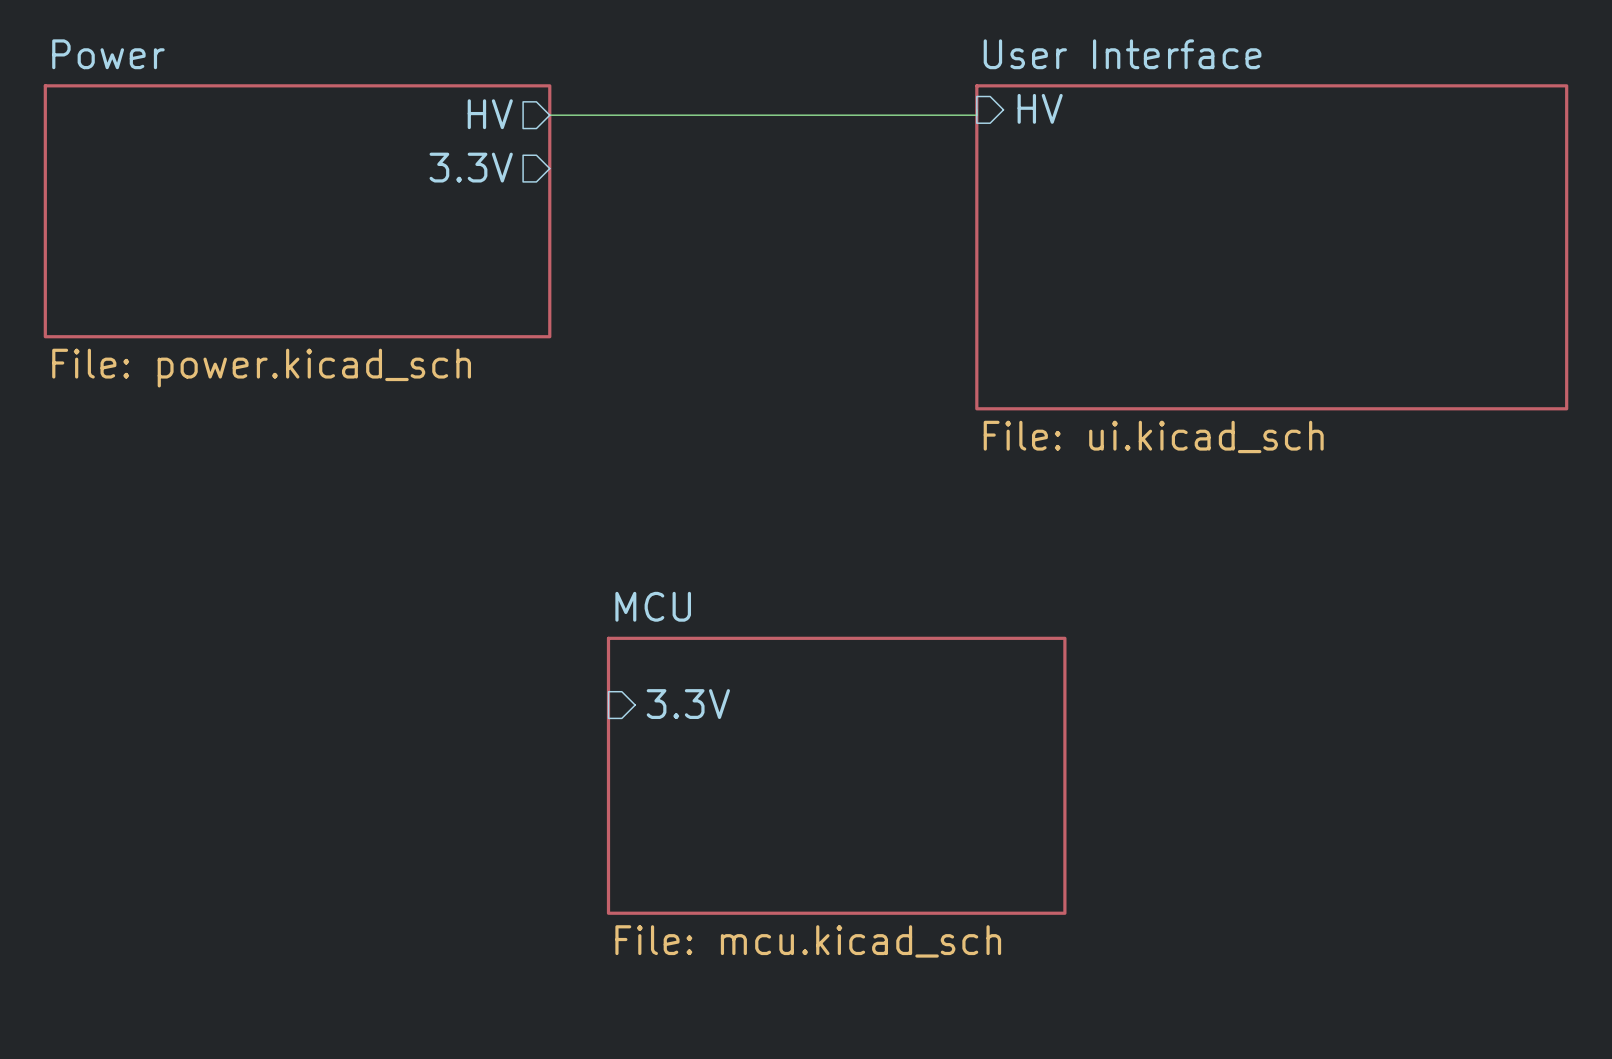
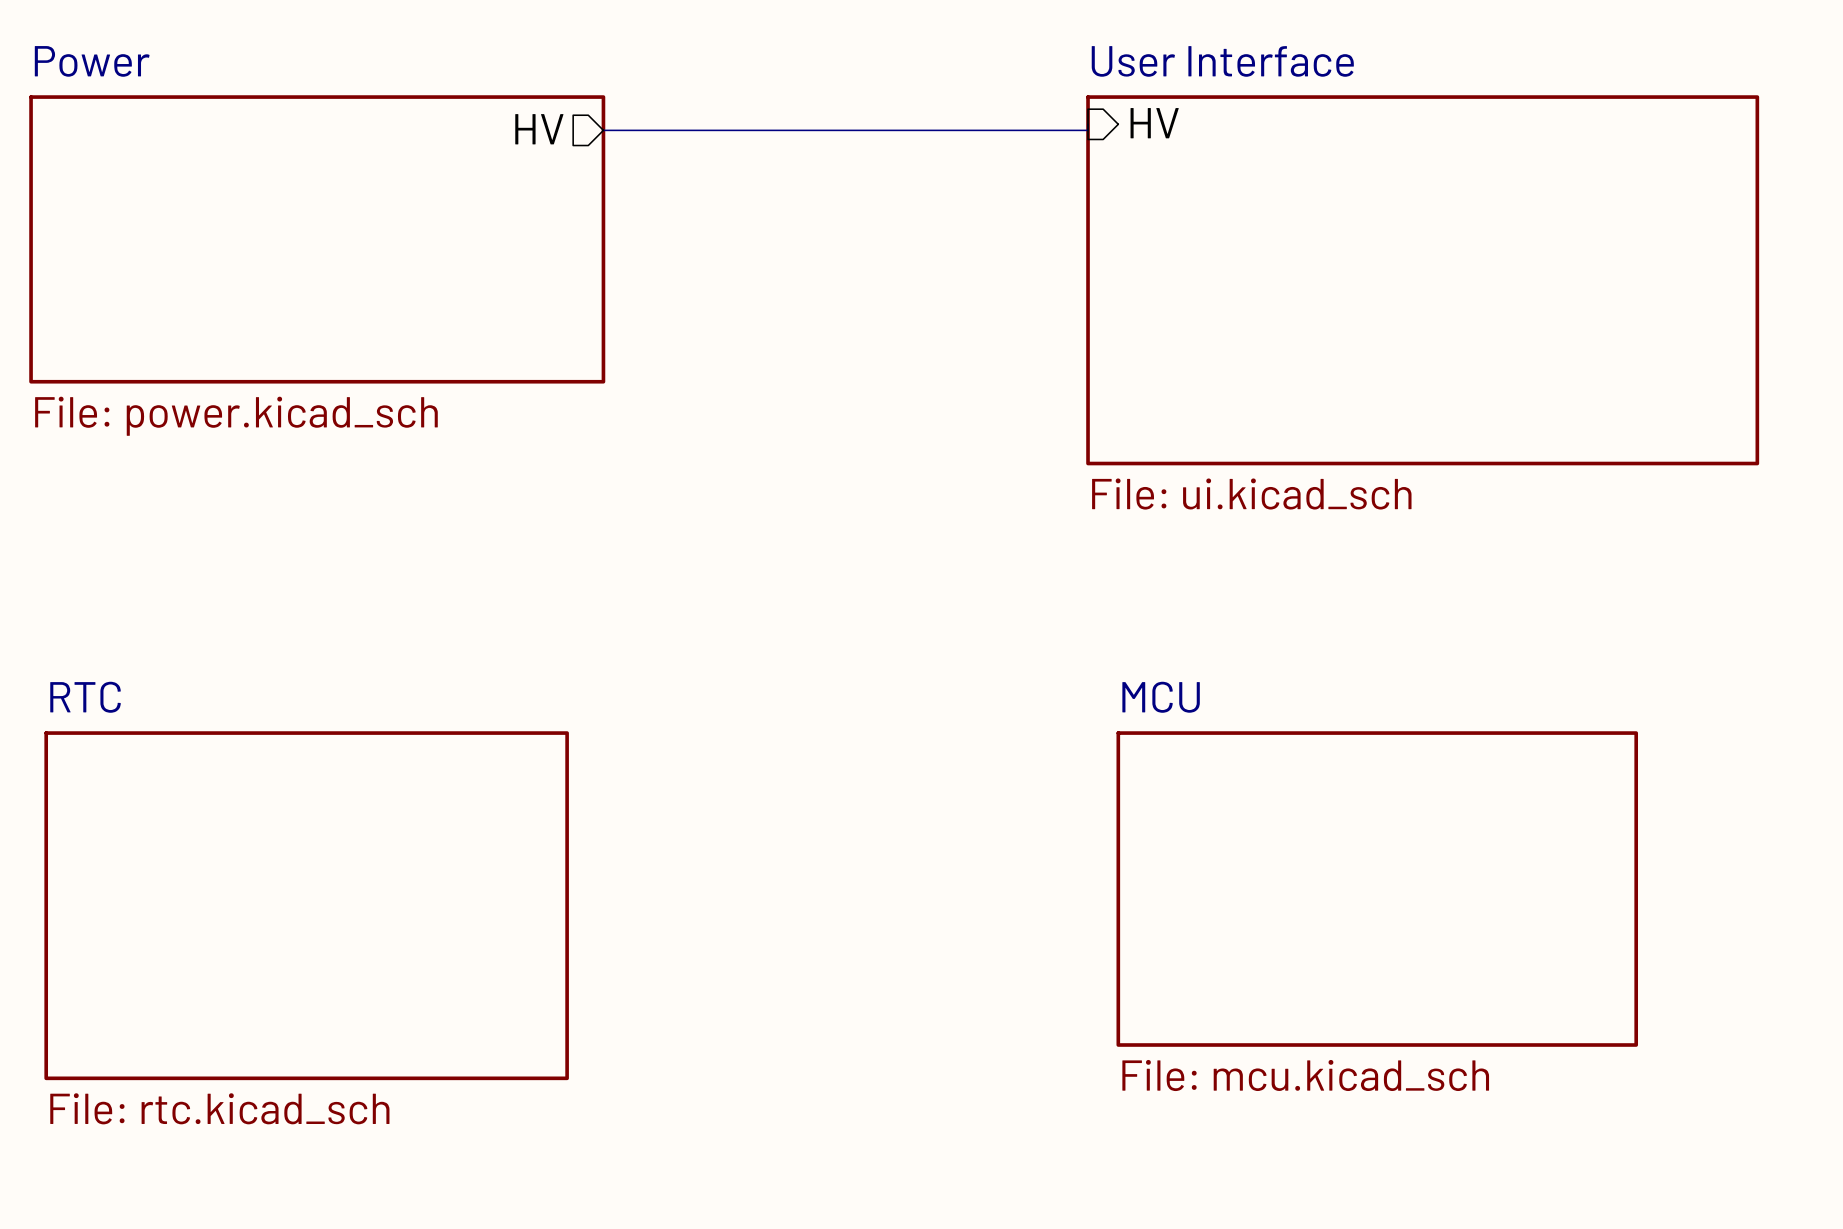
sheet pin: 3.3V (471, 167) -> none
sheet pin: 3.3V (688, 704) -> none
sheet MCU position: (836, 775) -> (1377, 889)
sheet RTC: none -> File: rtc.kicad_sch (306, 905)

